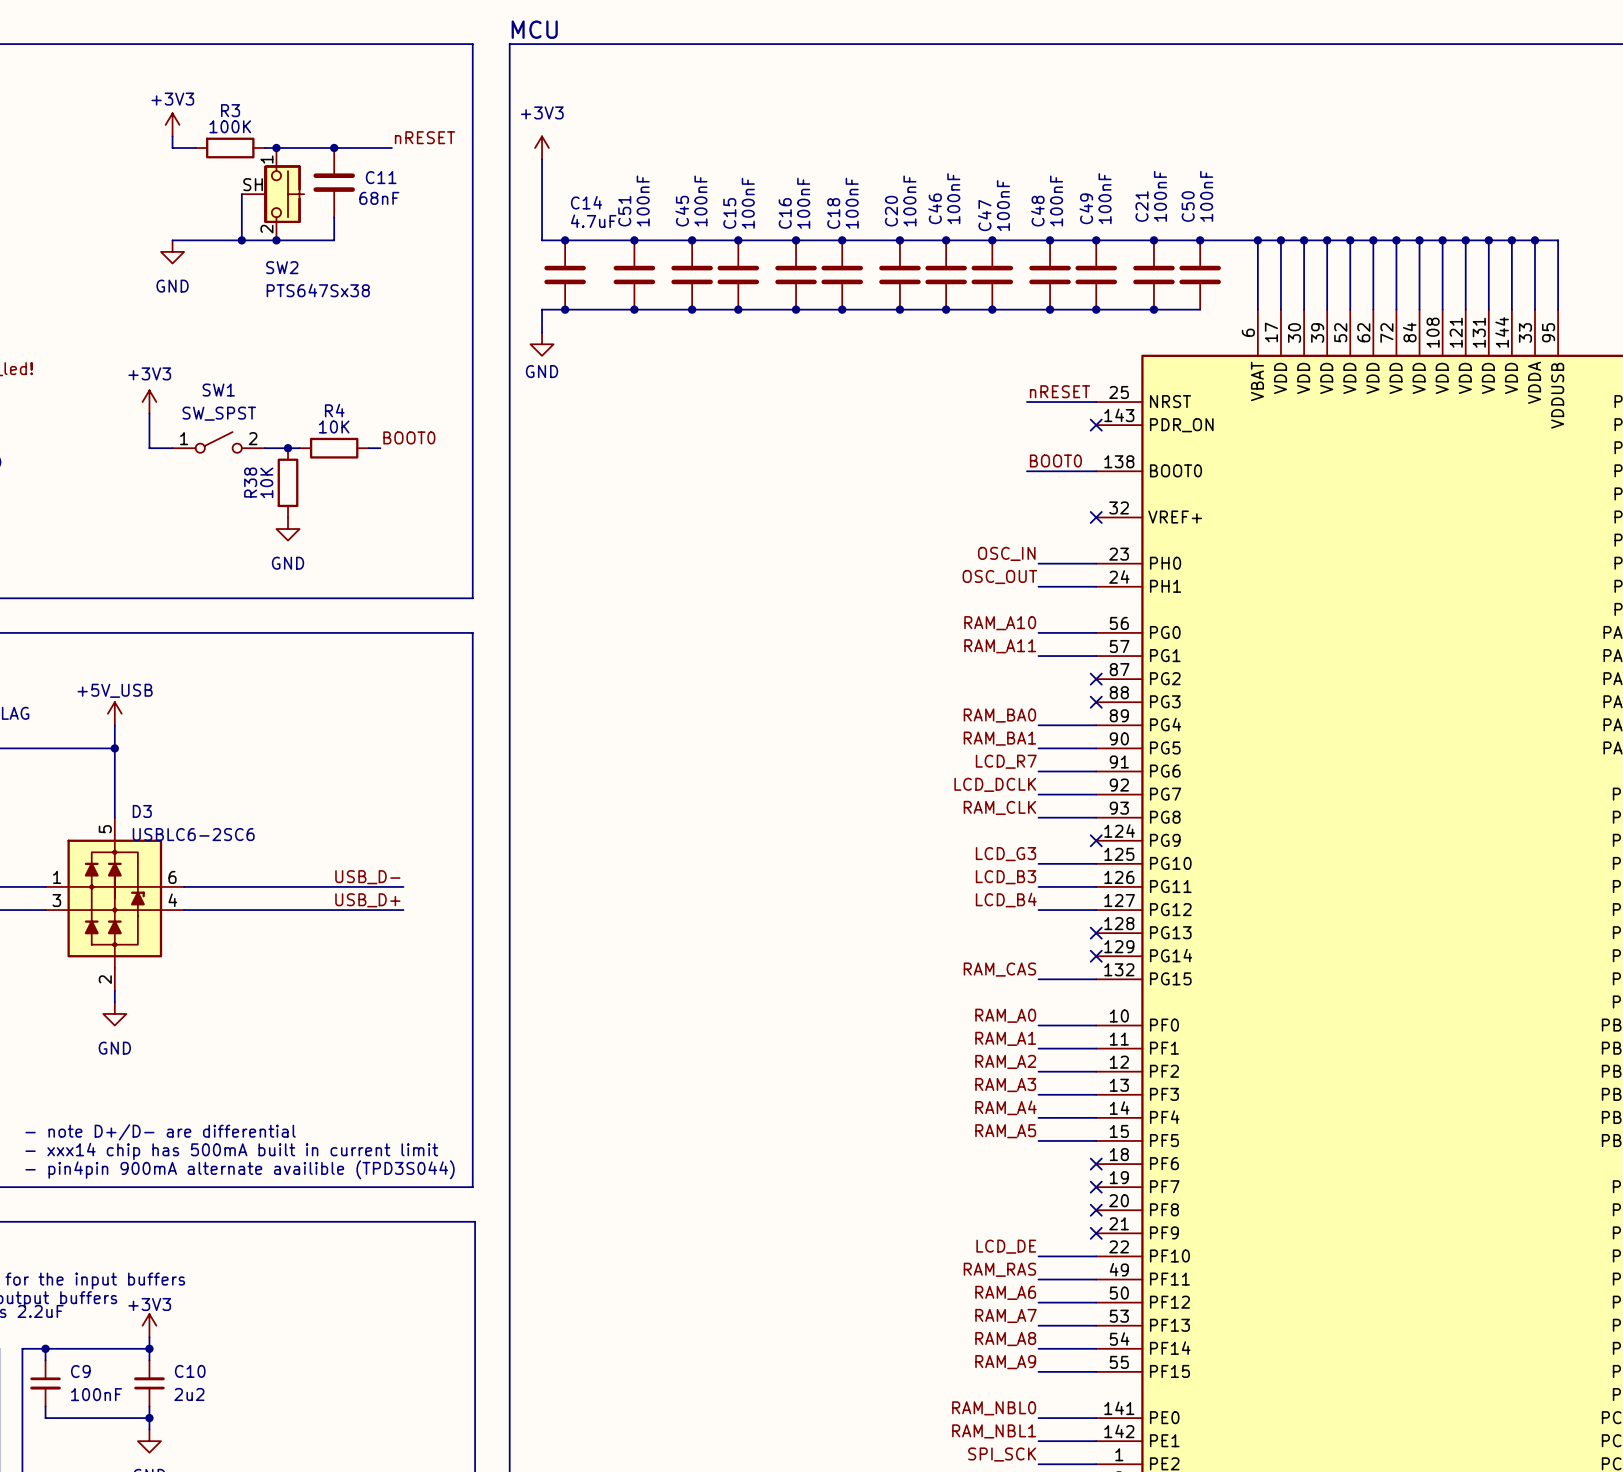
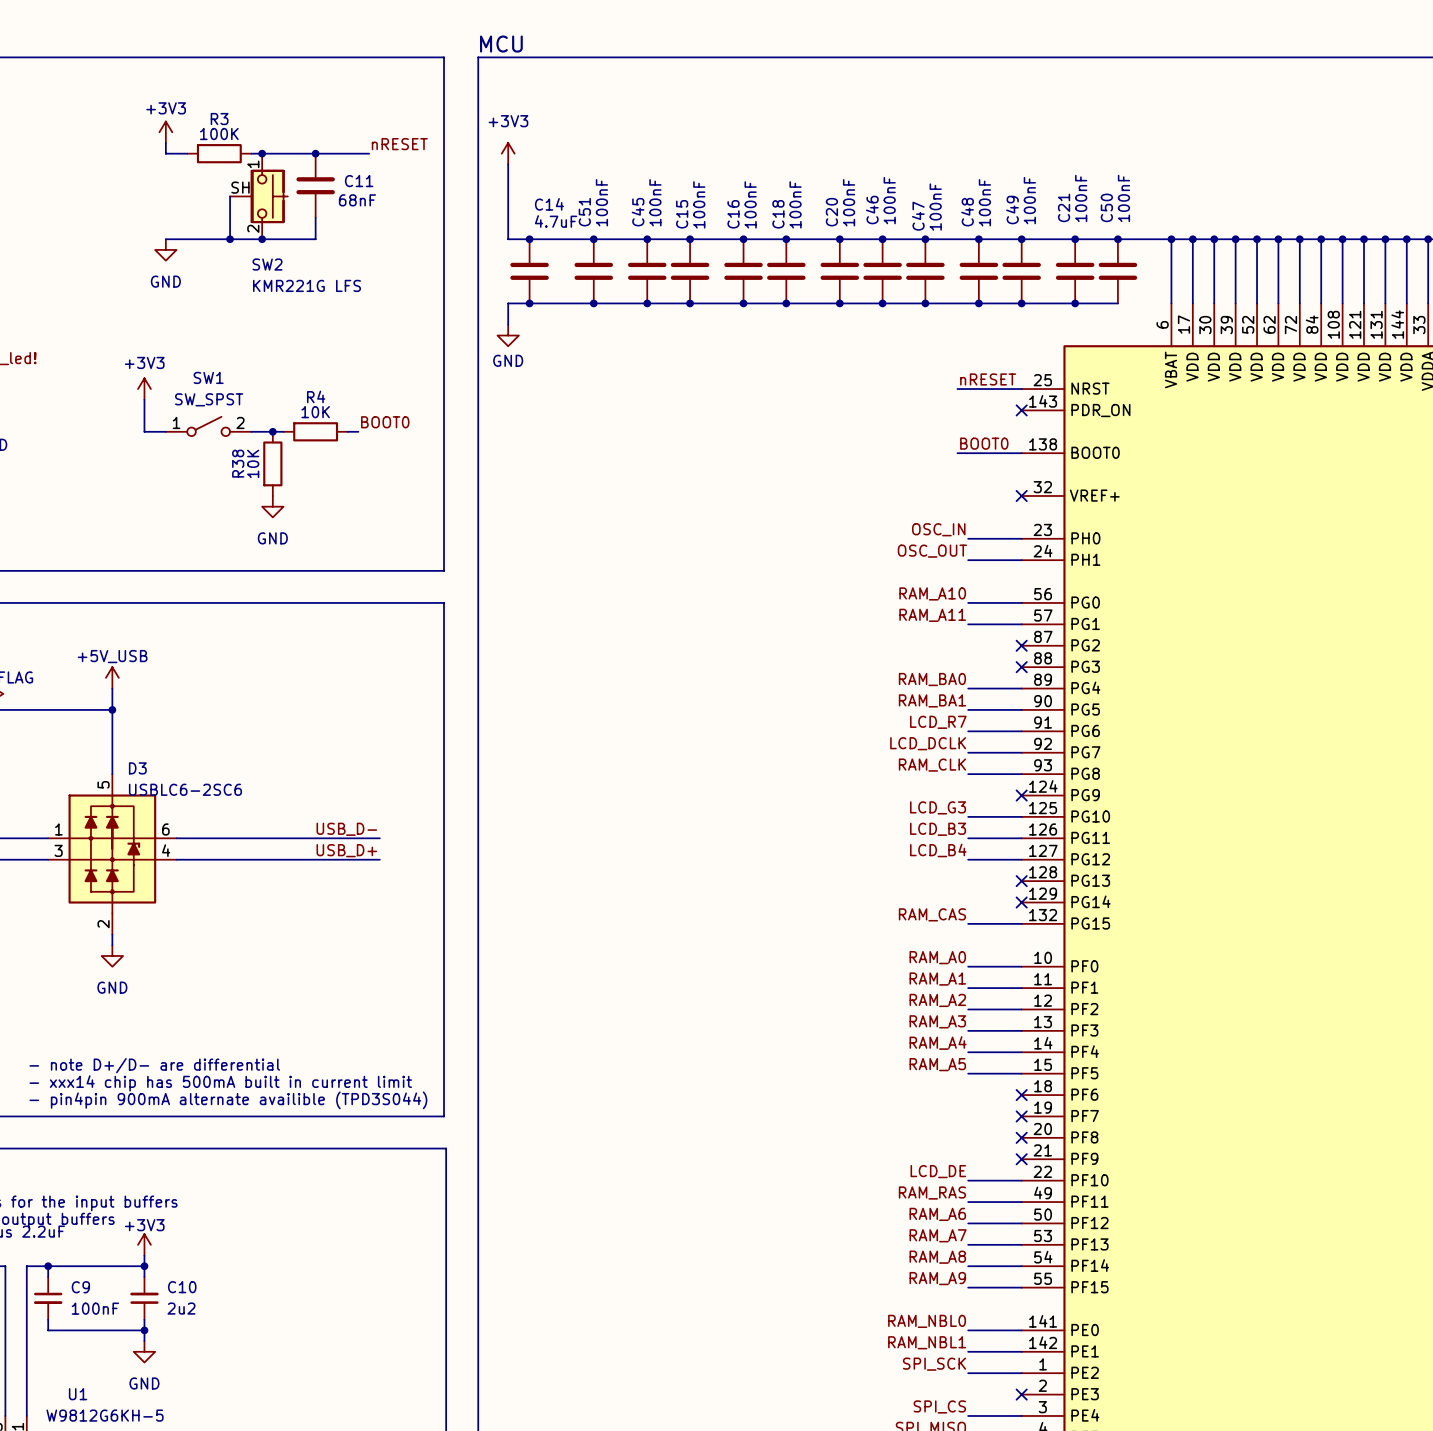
SW2 value: PTS647Sx38 (318, 290) -> KMR221G LFS (307, 285)

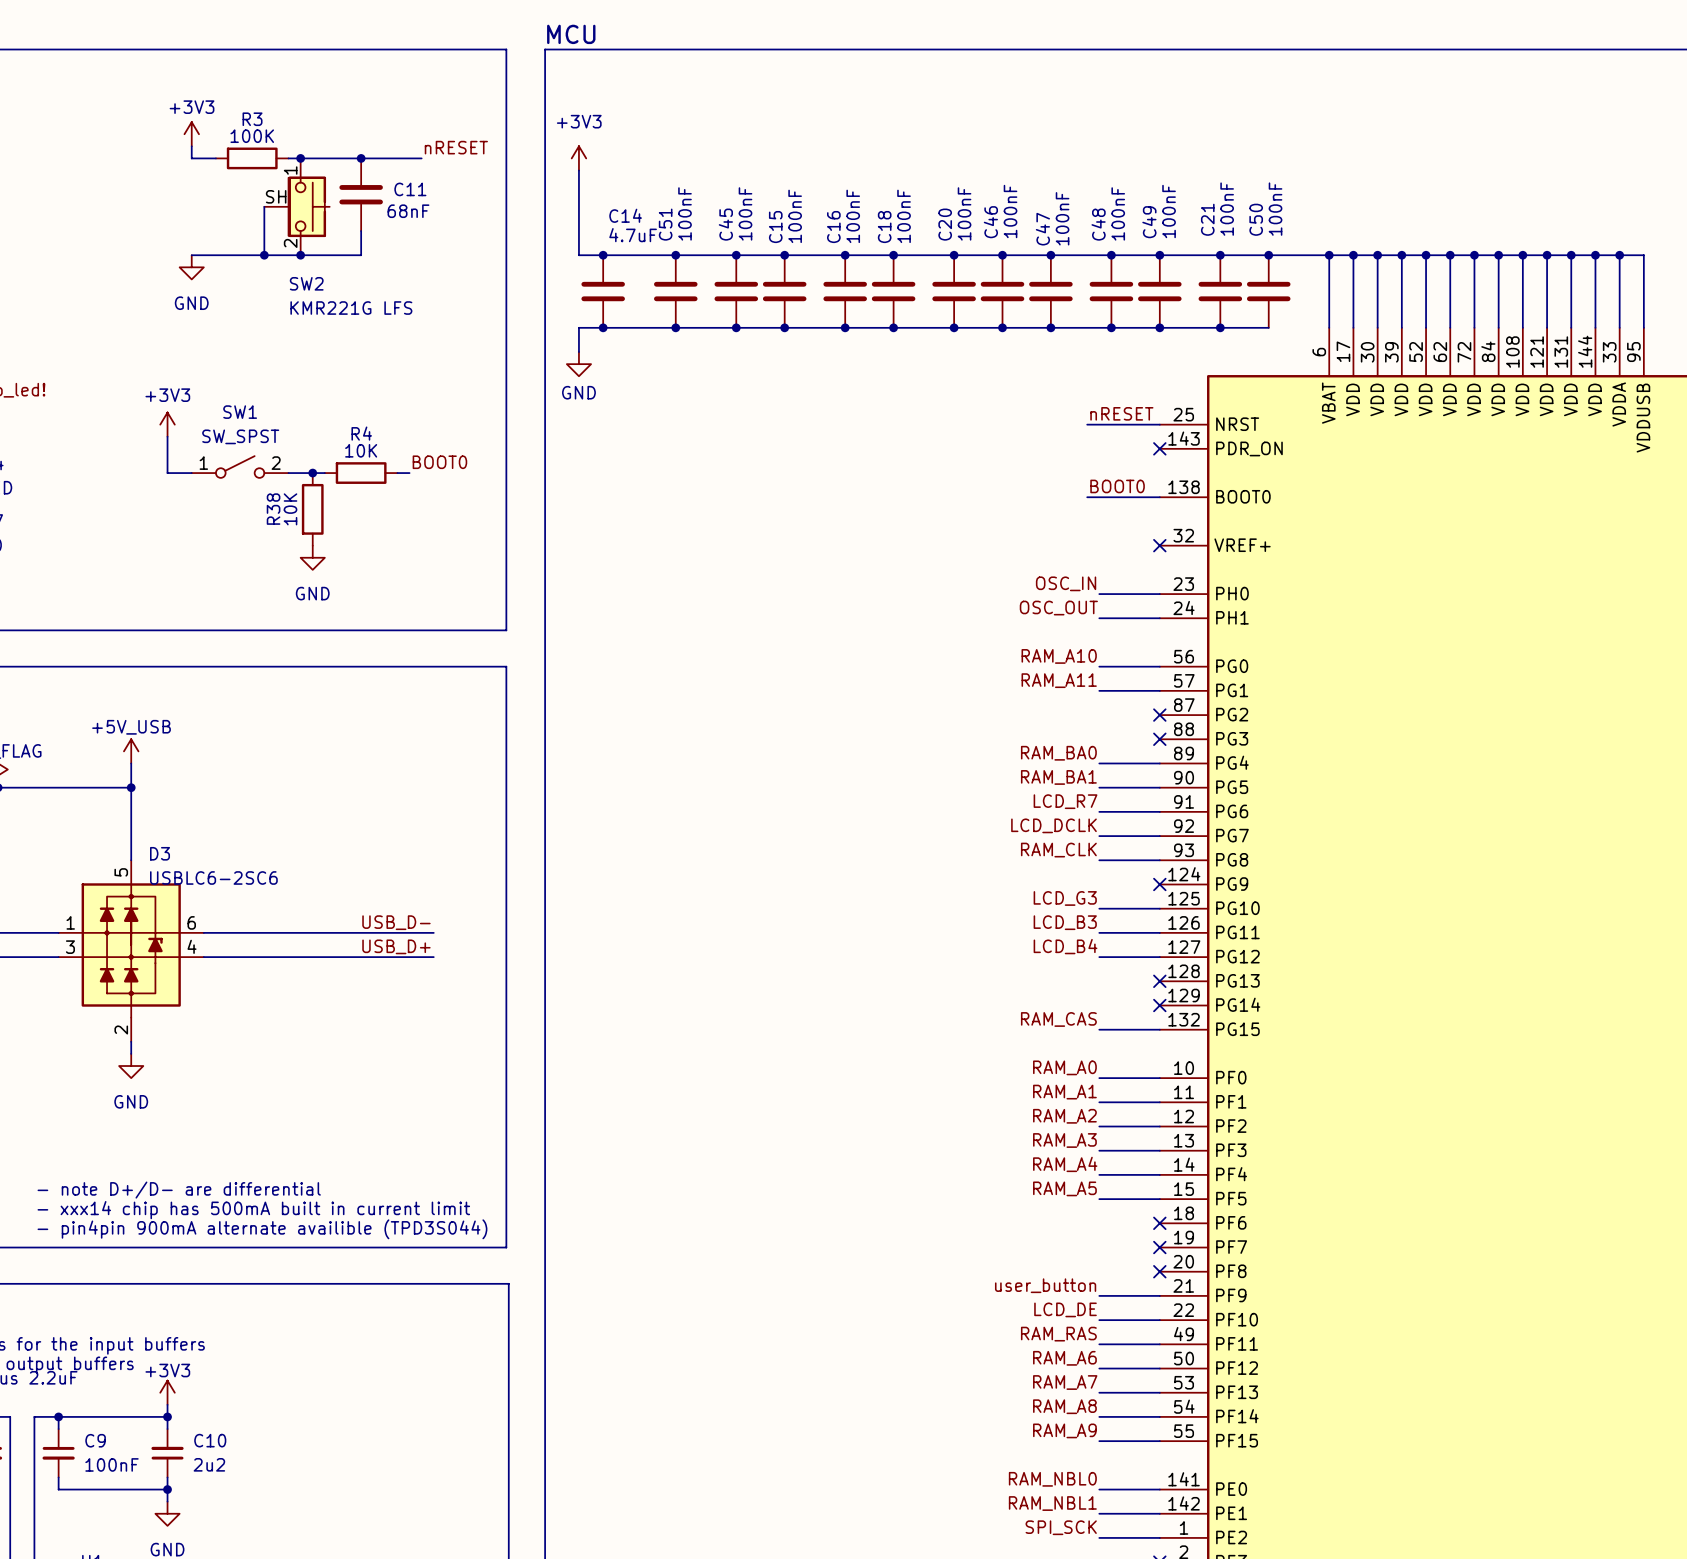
label: none -> user_button (1045, 1285)
wire: none -> (1099, 1295) (1159, 1295)
no-connect mark: (1021, 1159) -> none

